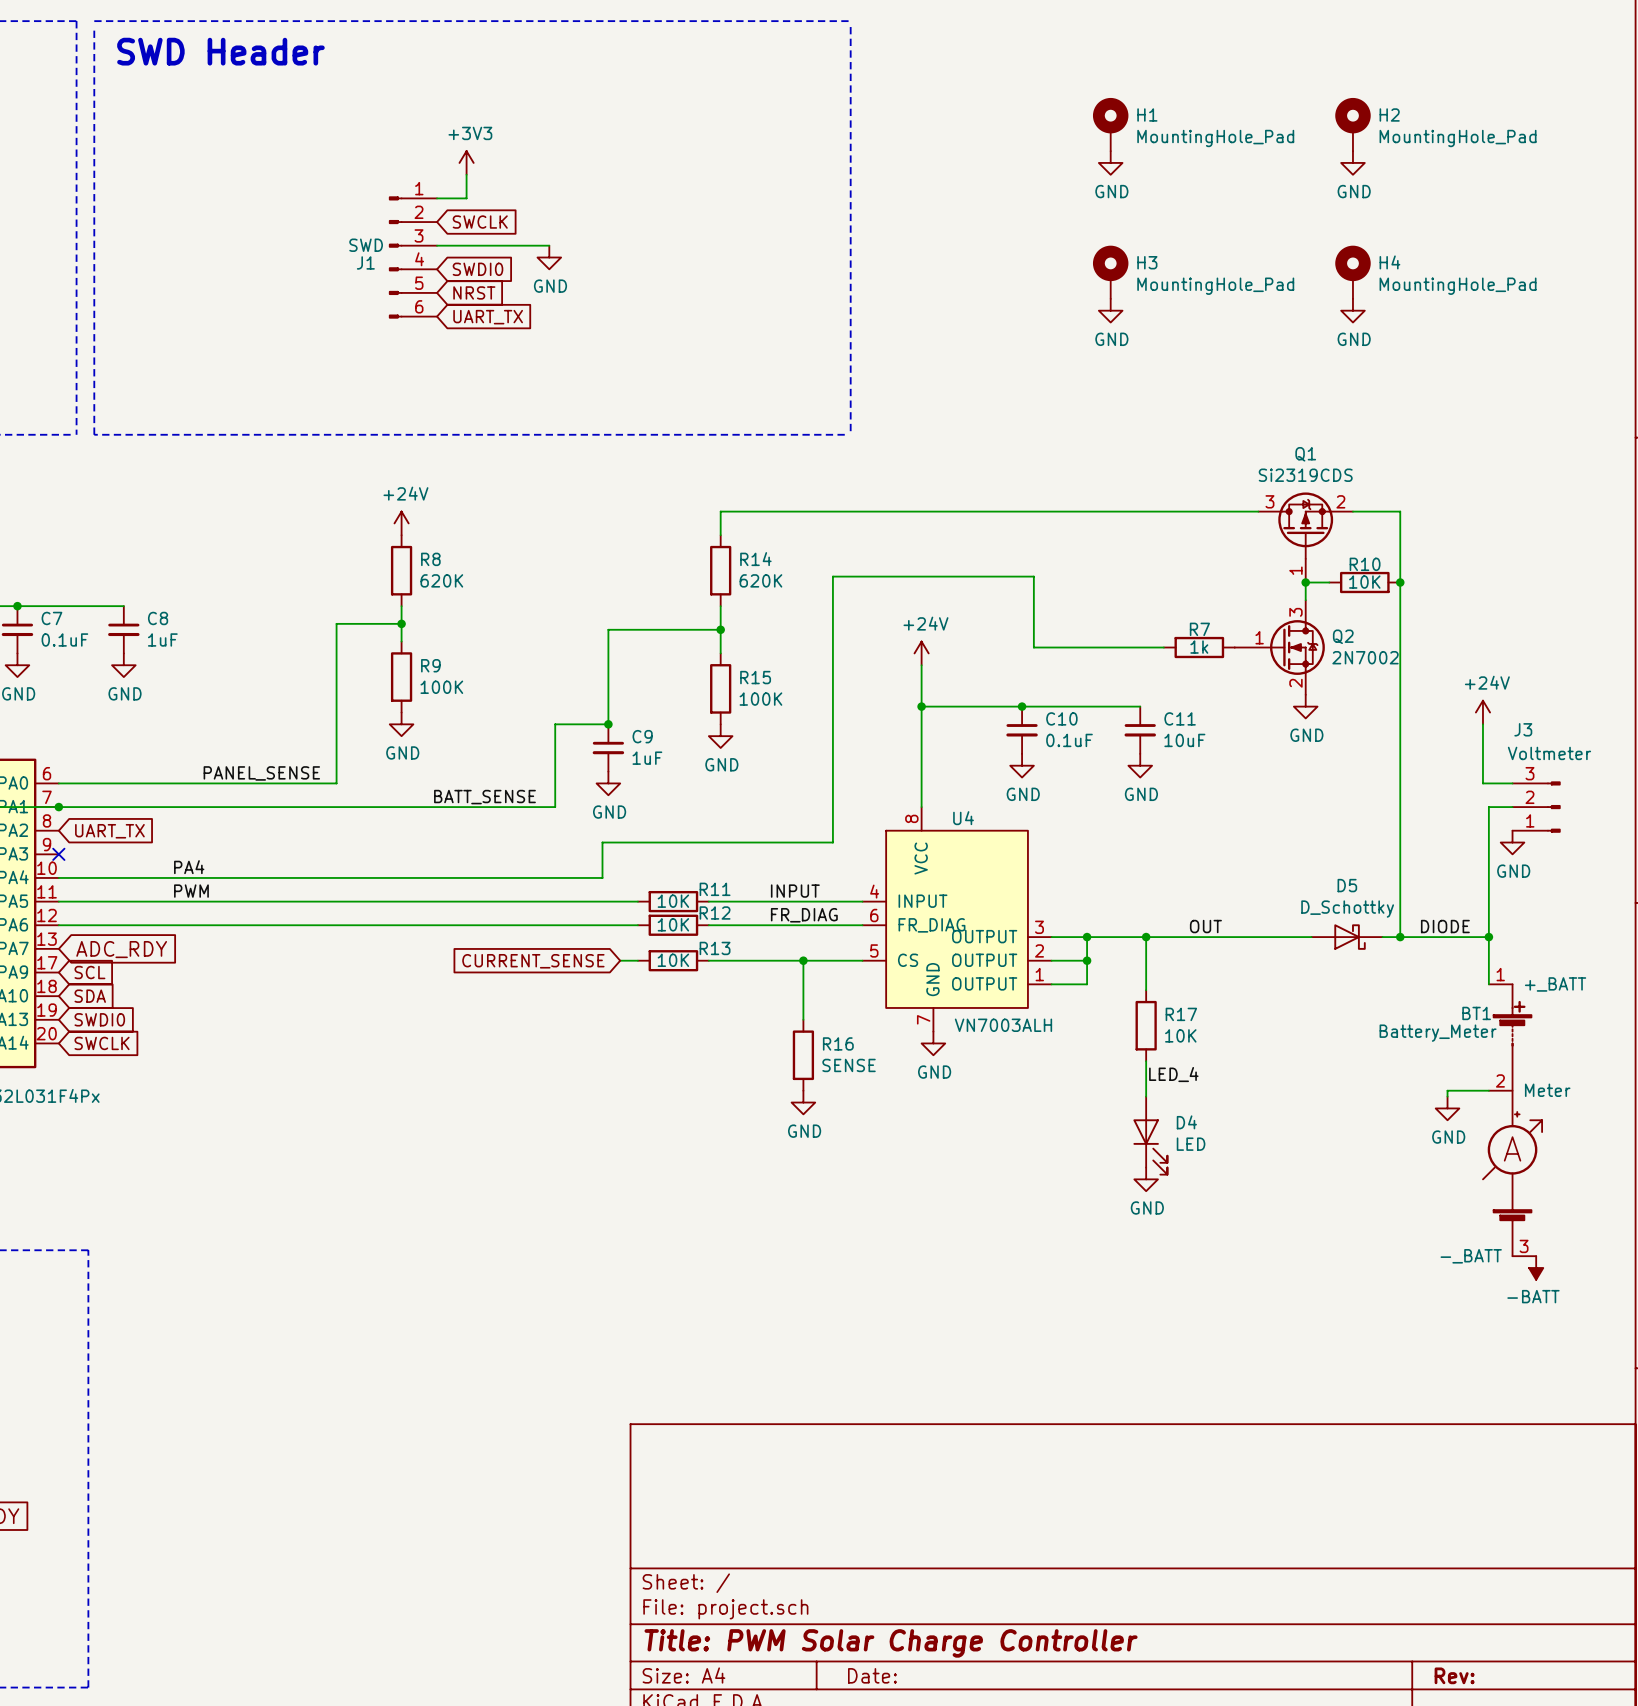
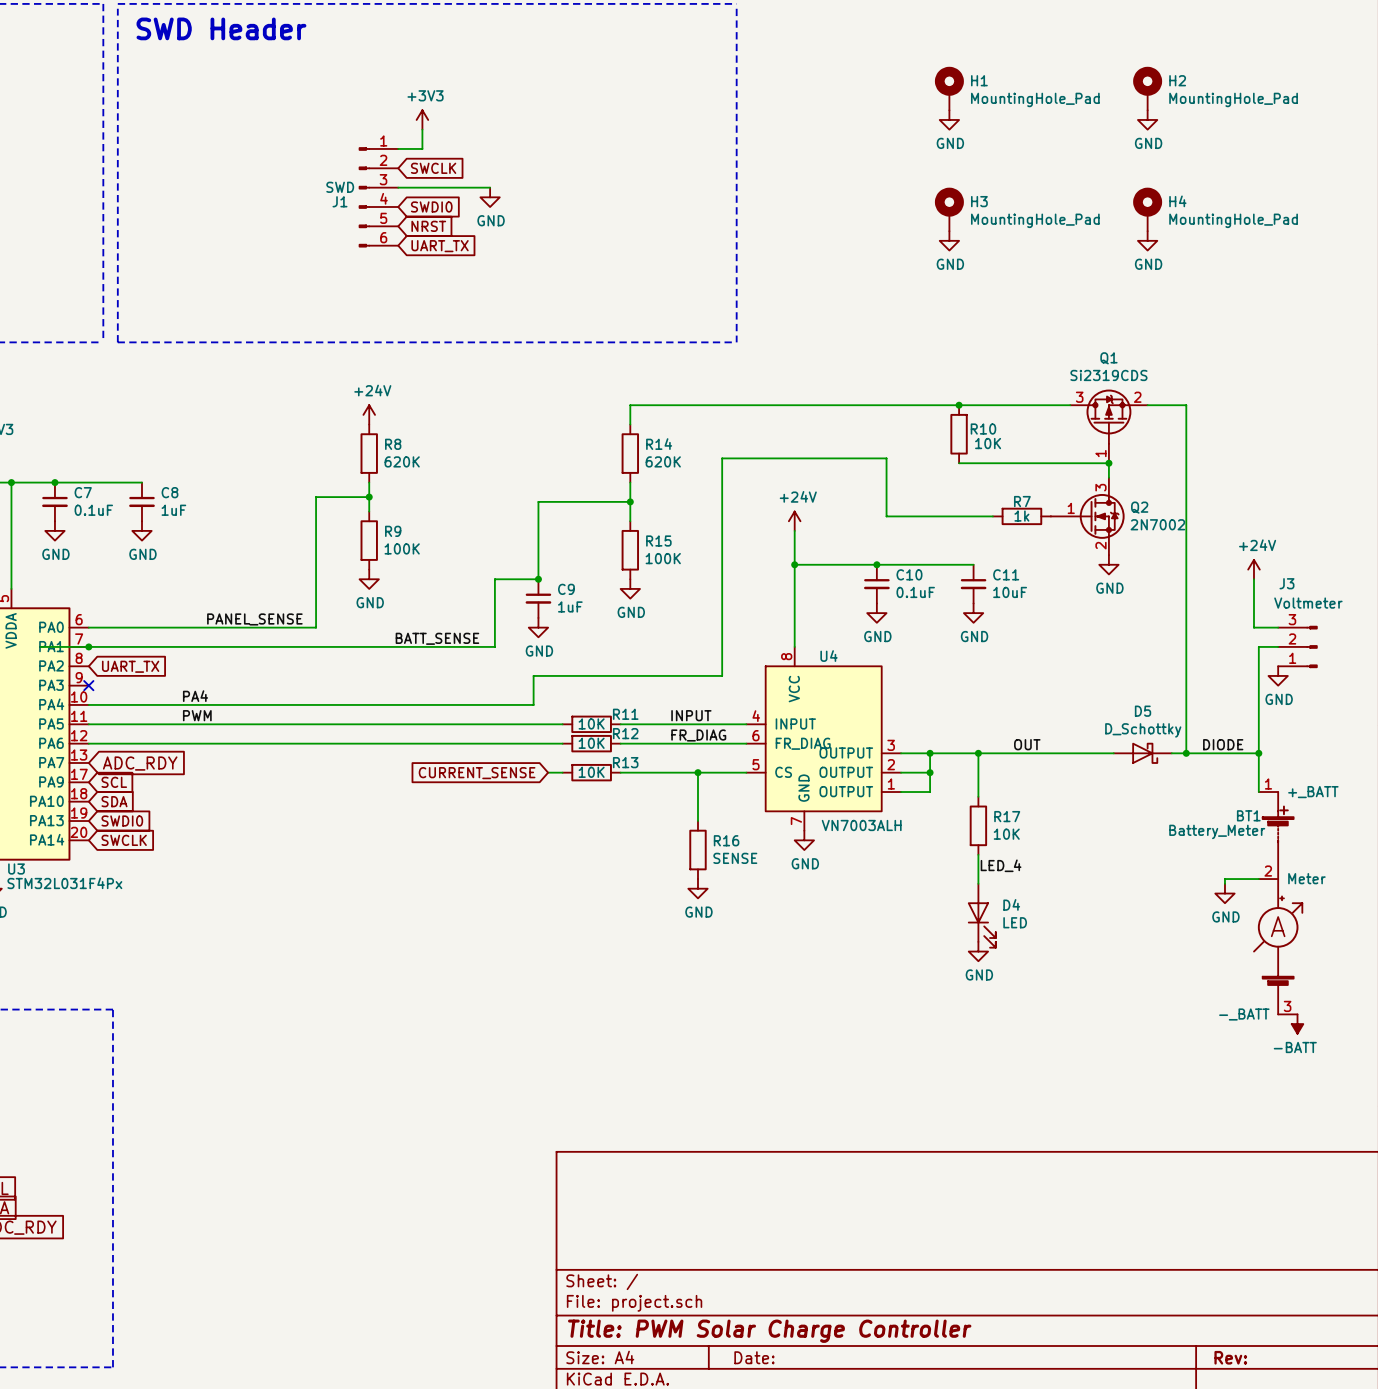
junction: none -> (959, 405)
wire: (1305, 582) (1329, 582) -> (1108, 463) (959, 463)
R10 rotation: 0° (1364, 582) -> 90° clockwise (959, 434)
R10 position: (1364, 582) -> (959, 434)
R10 value position: 10K (1364, 582) -> 10K (988, 443)
junction: (1400, 582) -> none

